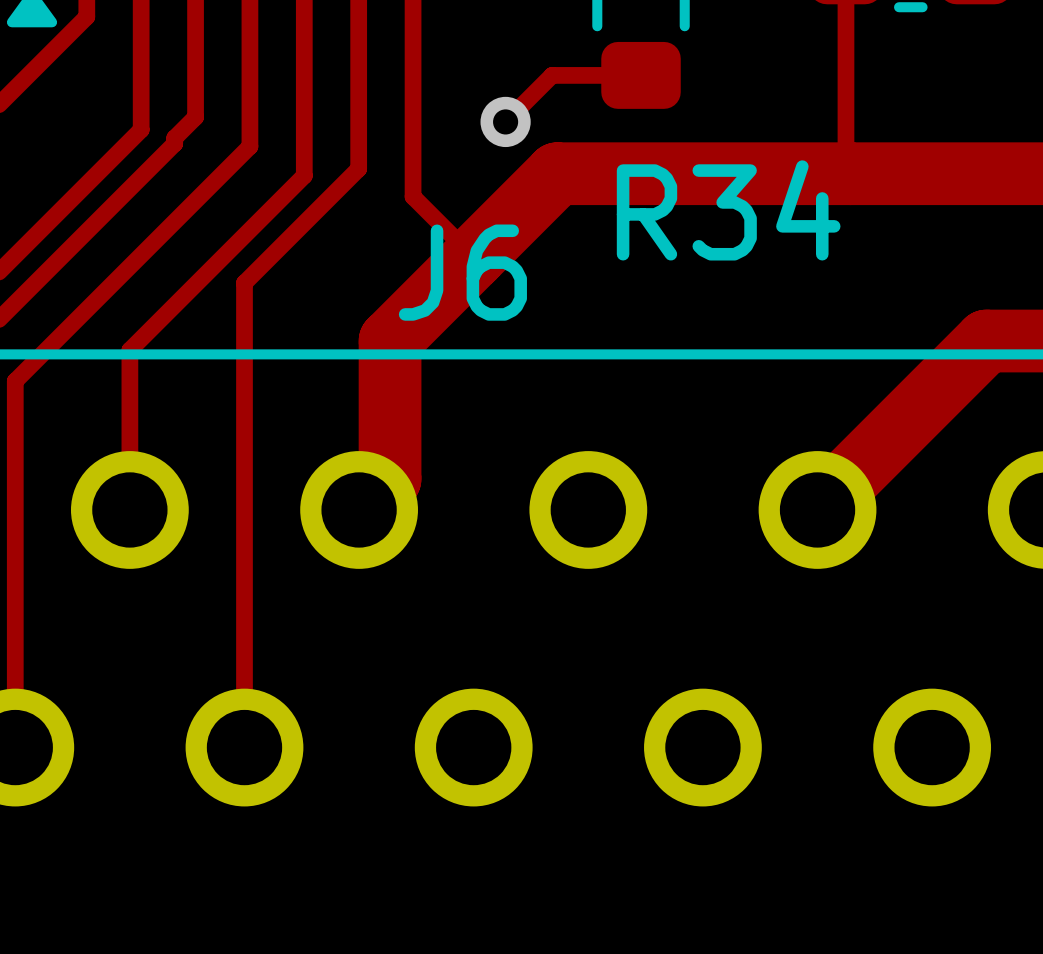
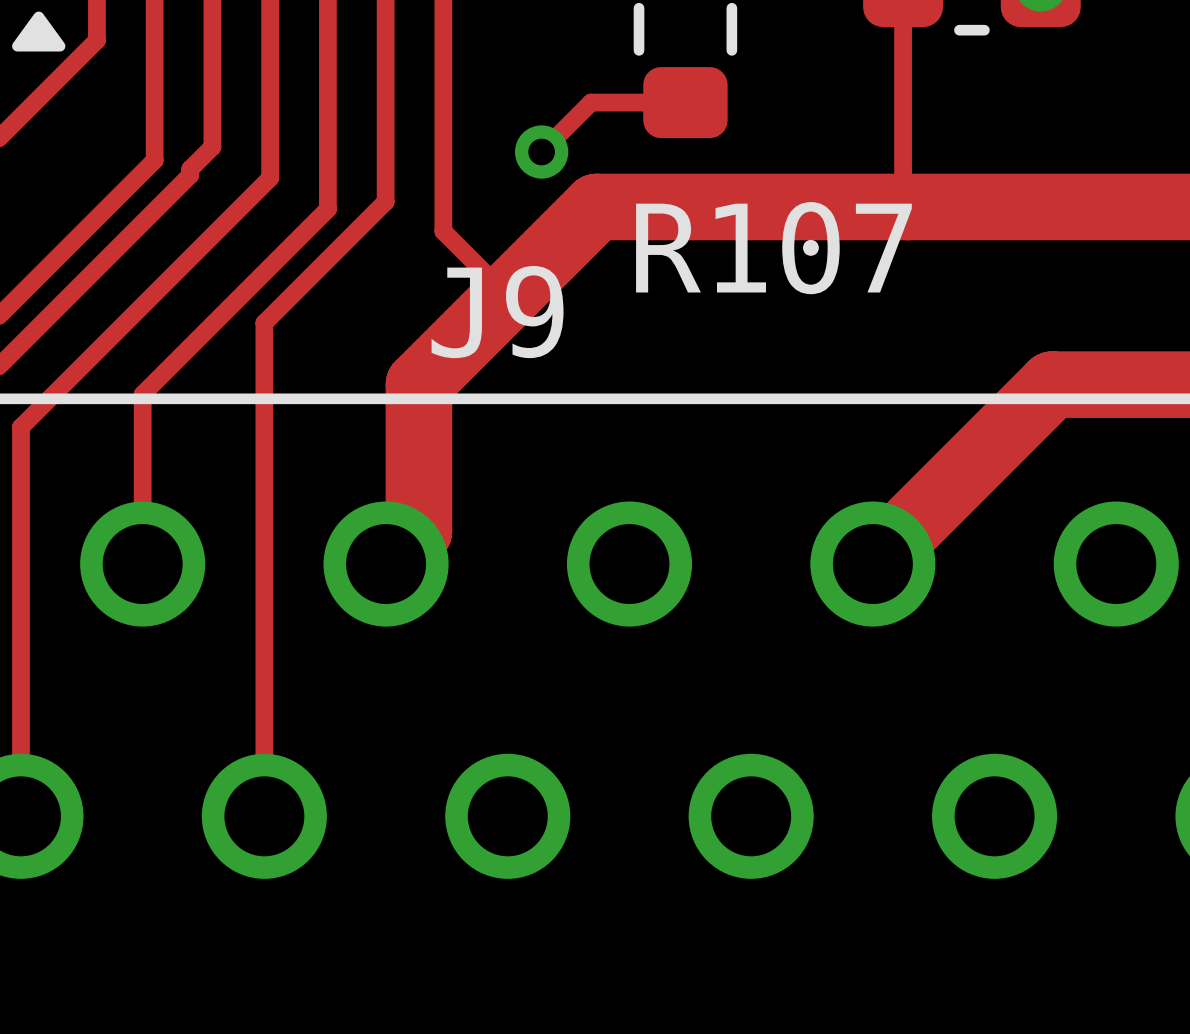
R34 name: R34 (728, 210) -> R107 (773, 248)
J6 name: J6 (462, 272) -> J9 (497, 312)

